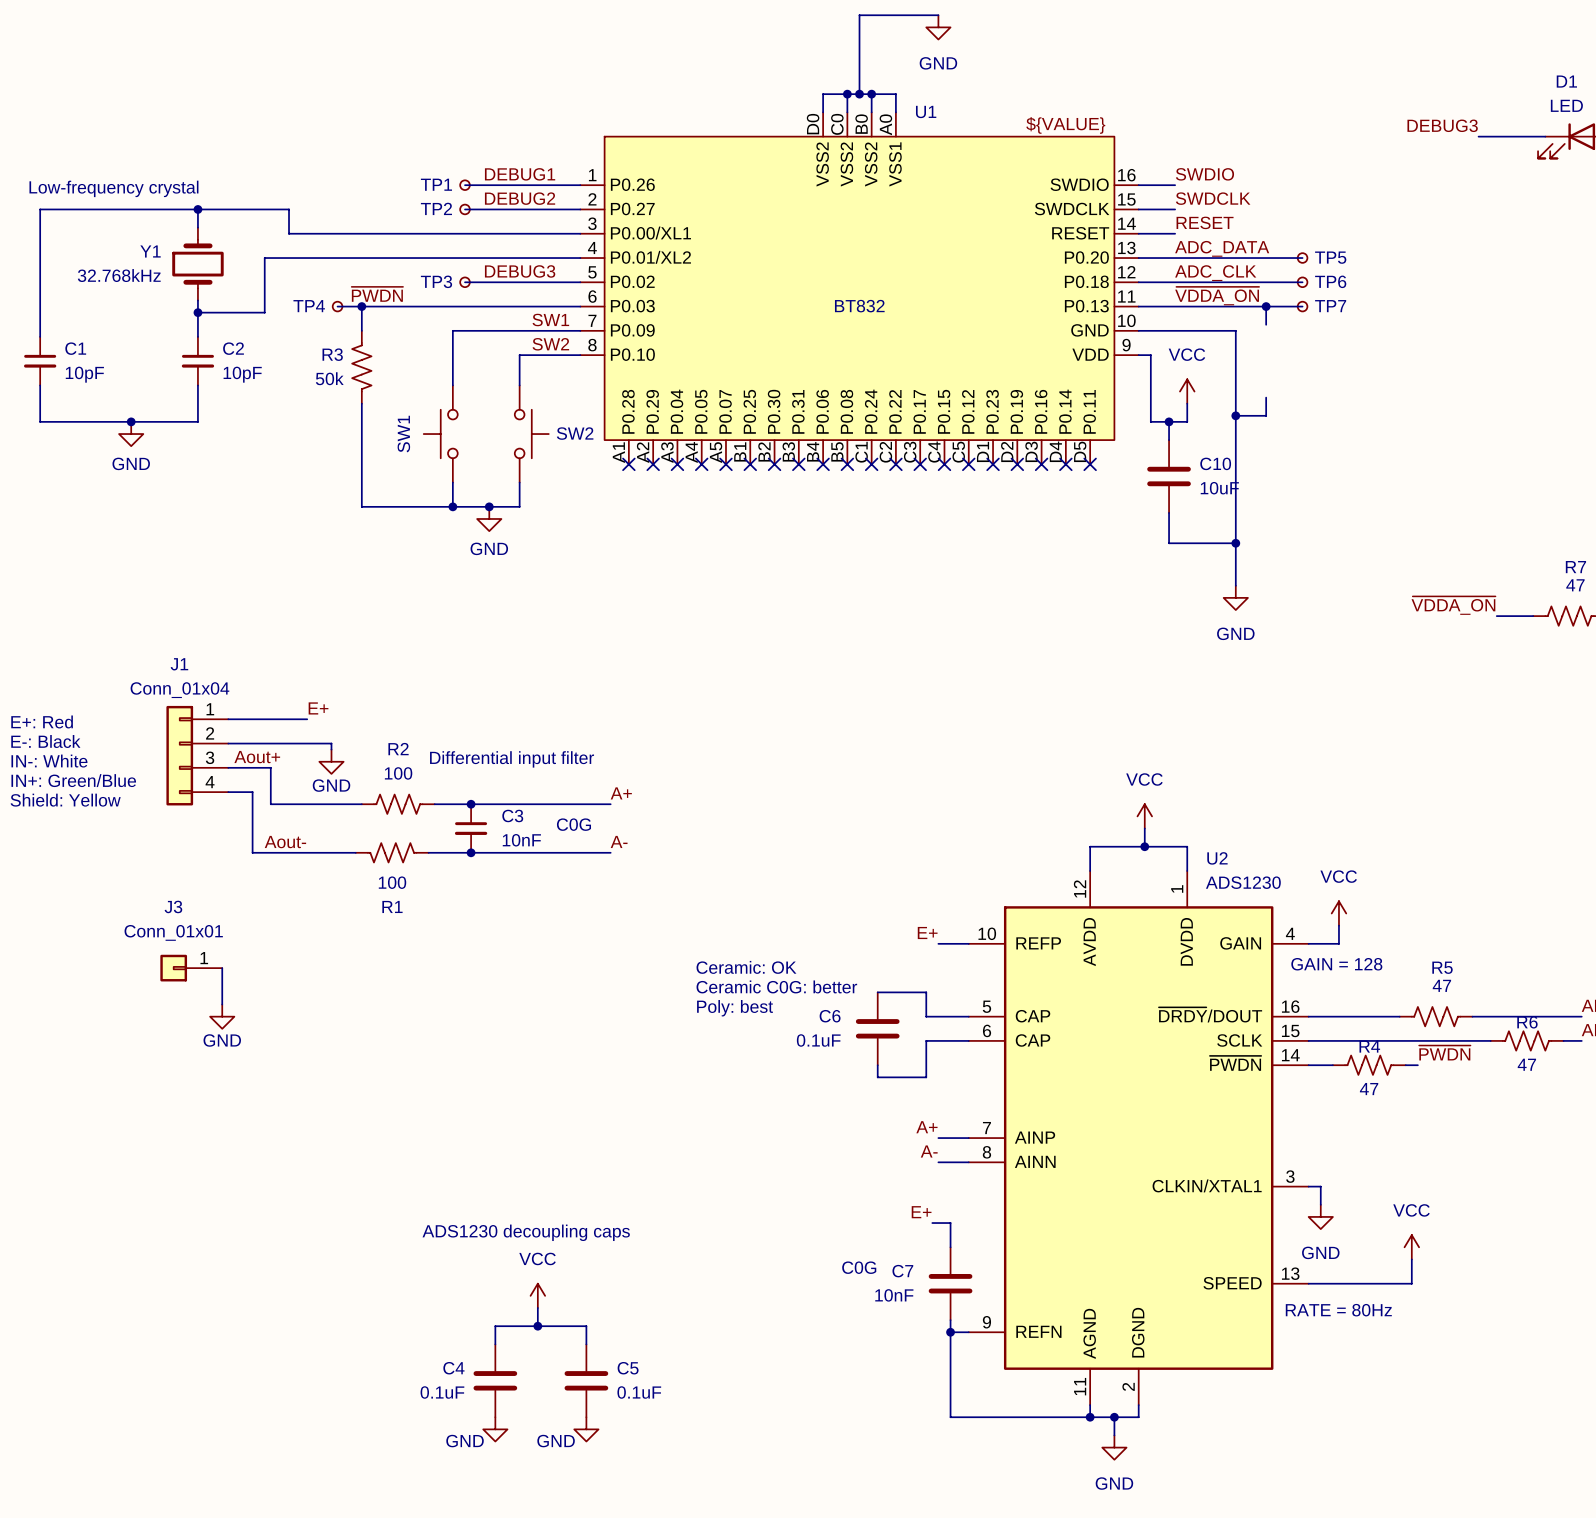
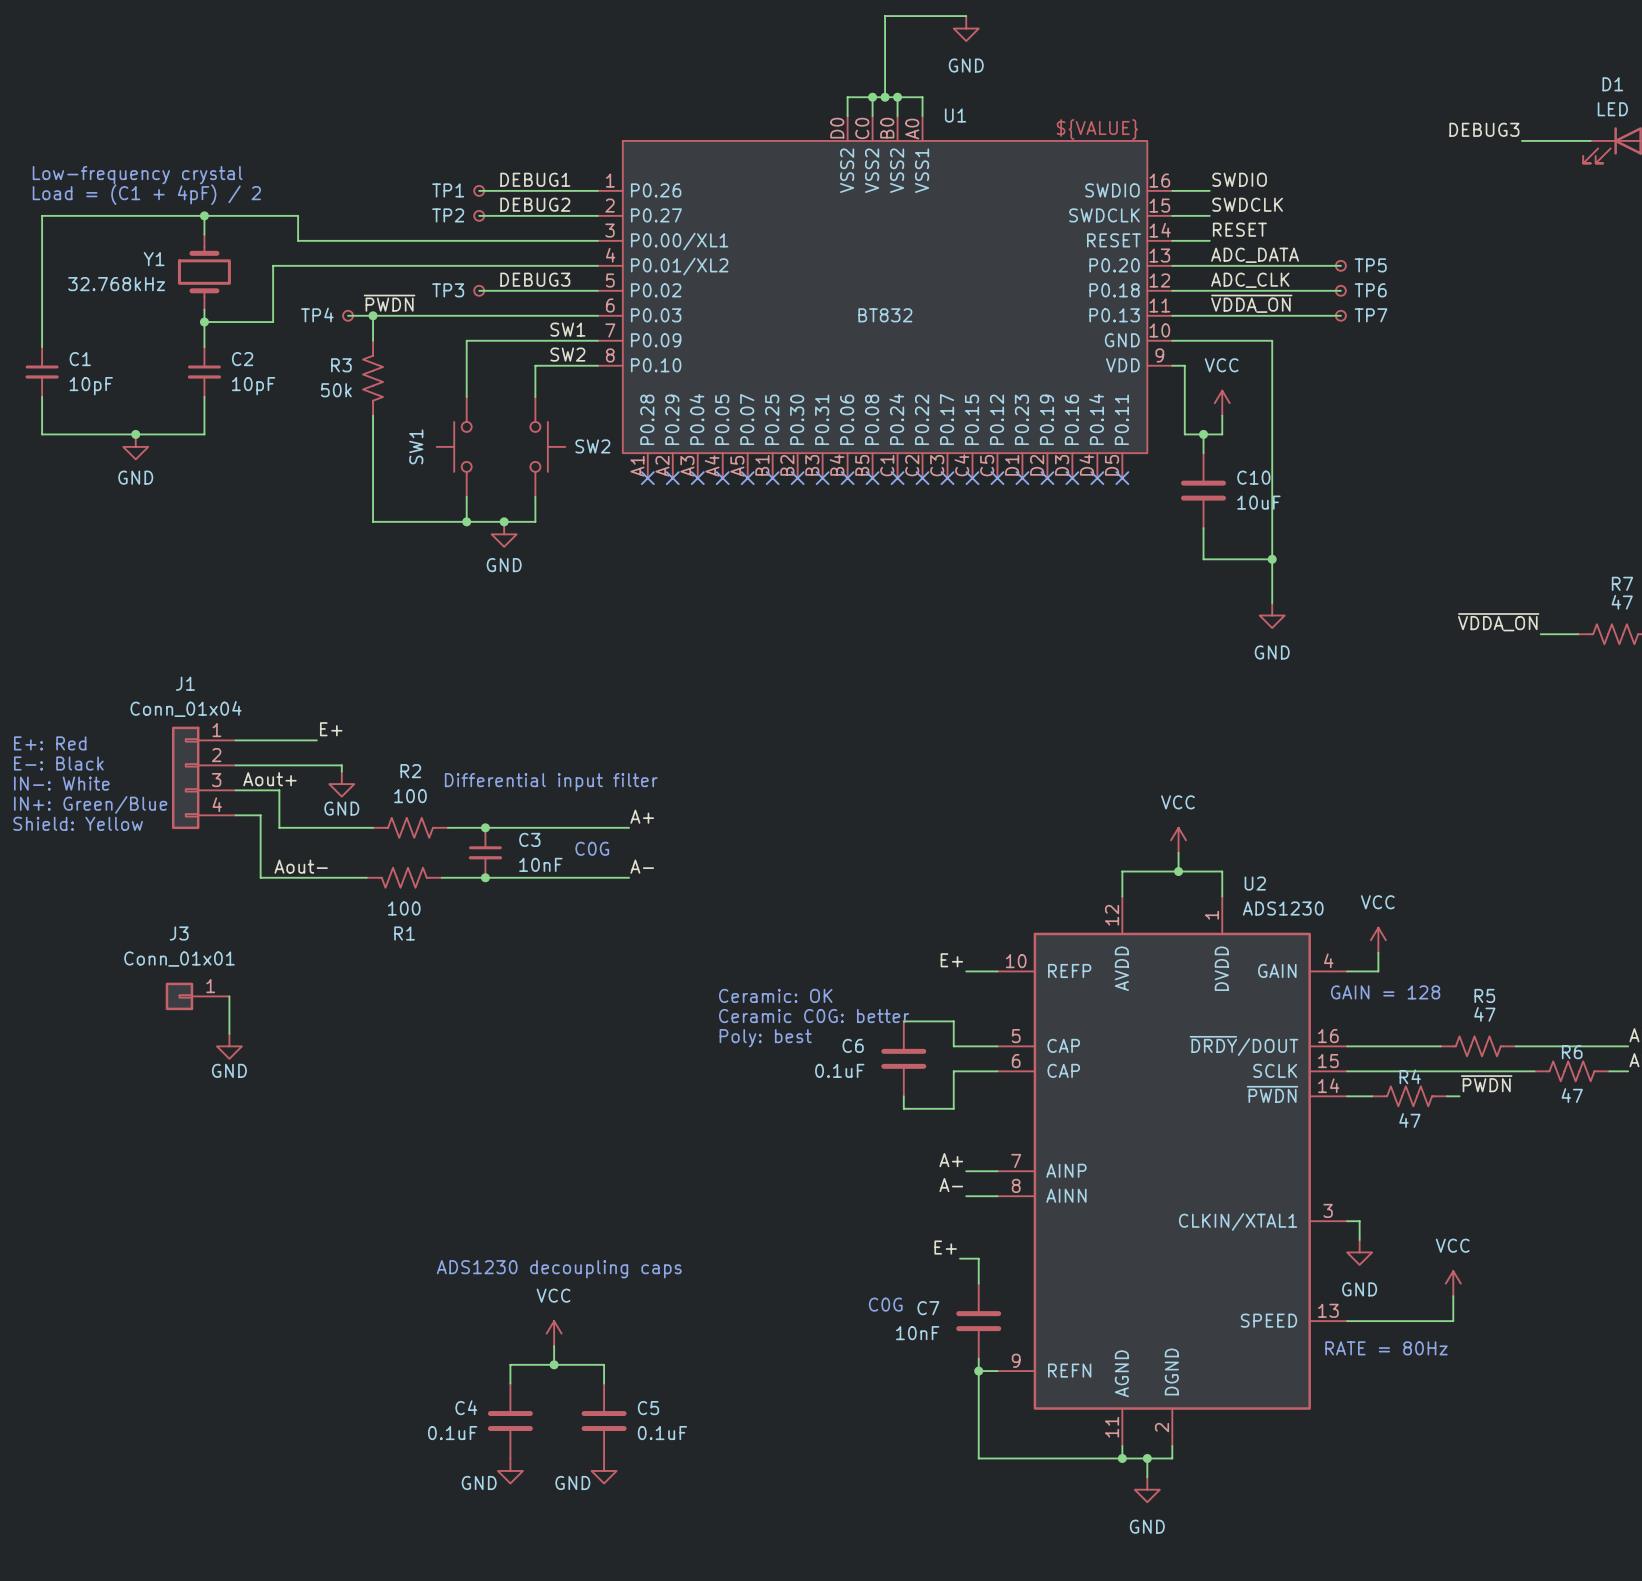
text: none -> Low-frequency crystal (137, 175)
text: Low-frequency crystal (113, 188) -> Load = (C1 + 4pF) / 2 (146, 194)
wire: (1266, 306) (1266, 324) -> none
junction: (1266, 306) -> none
wire: (1266, 397) (1266, 415) (1235, 415) -> none
junction: (1235, 415) -> none

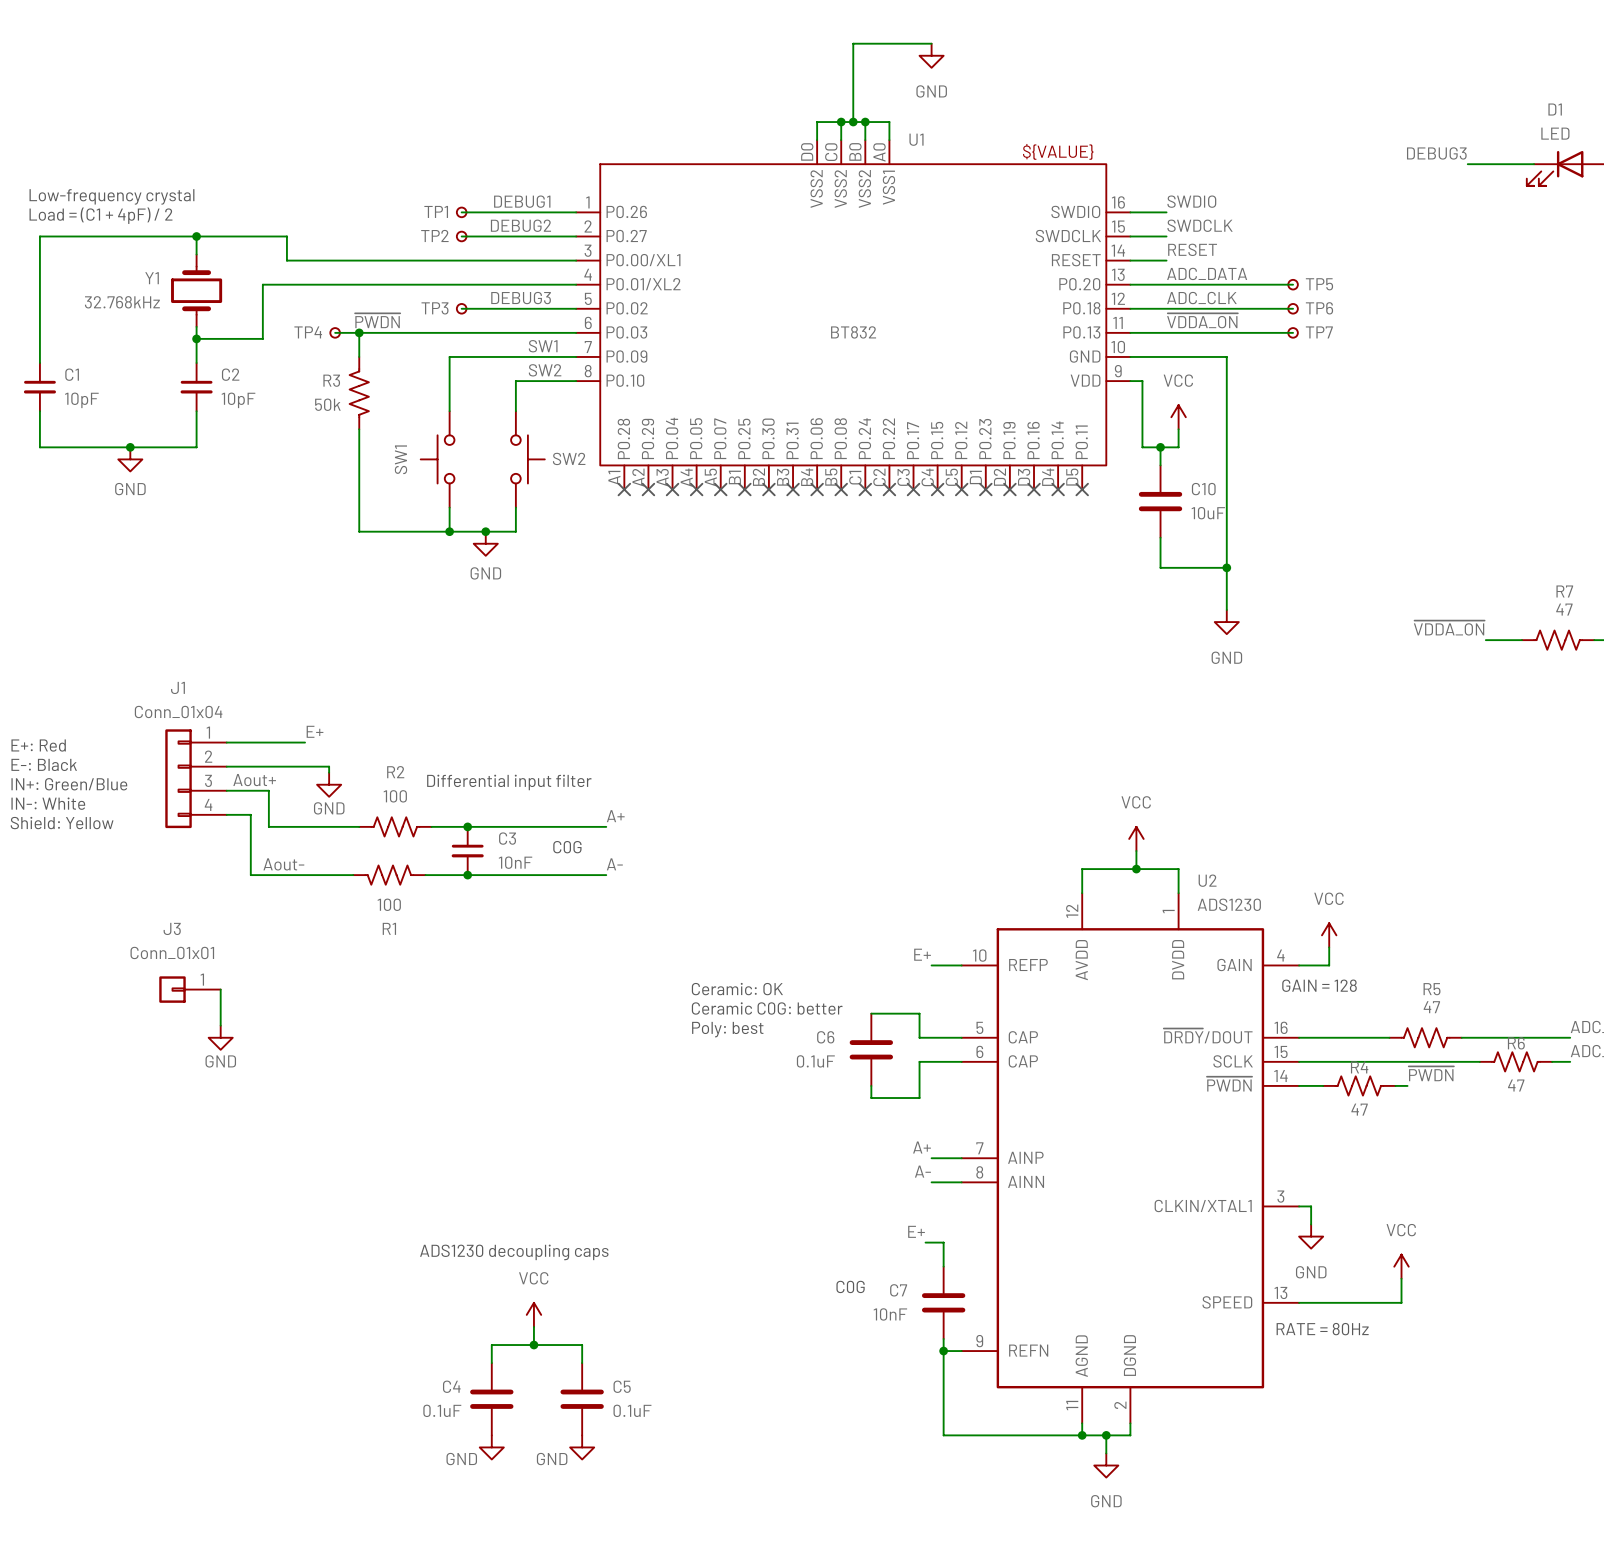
text: IN-: White (61, 783) -> IN+: Green/Blue (69, 784)
text: IN+: Green/Blue (90, 804) -> IN-: White (48, 803)

